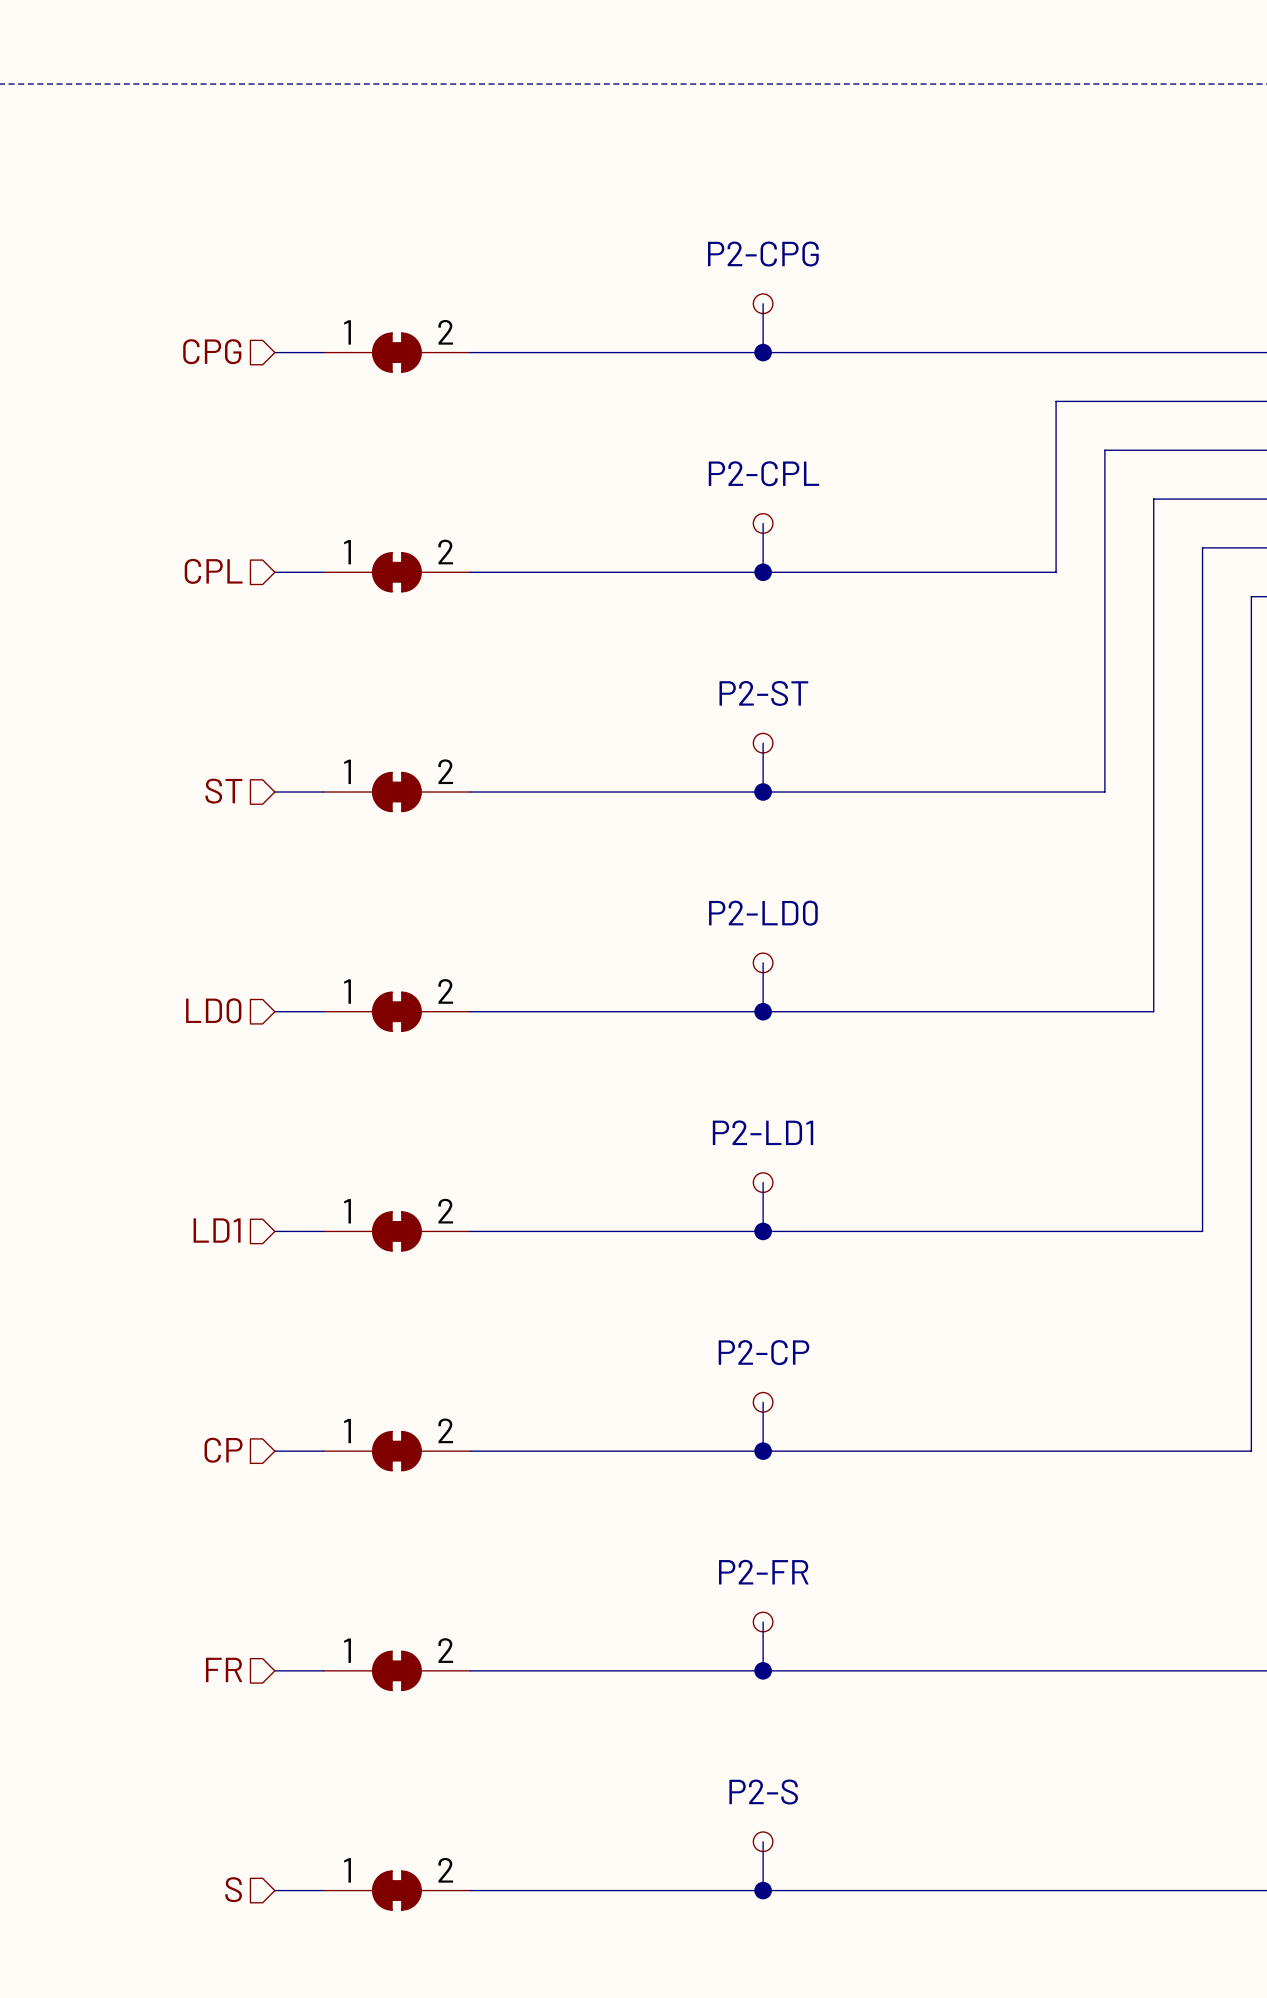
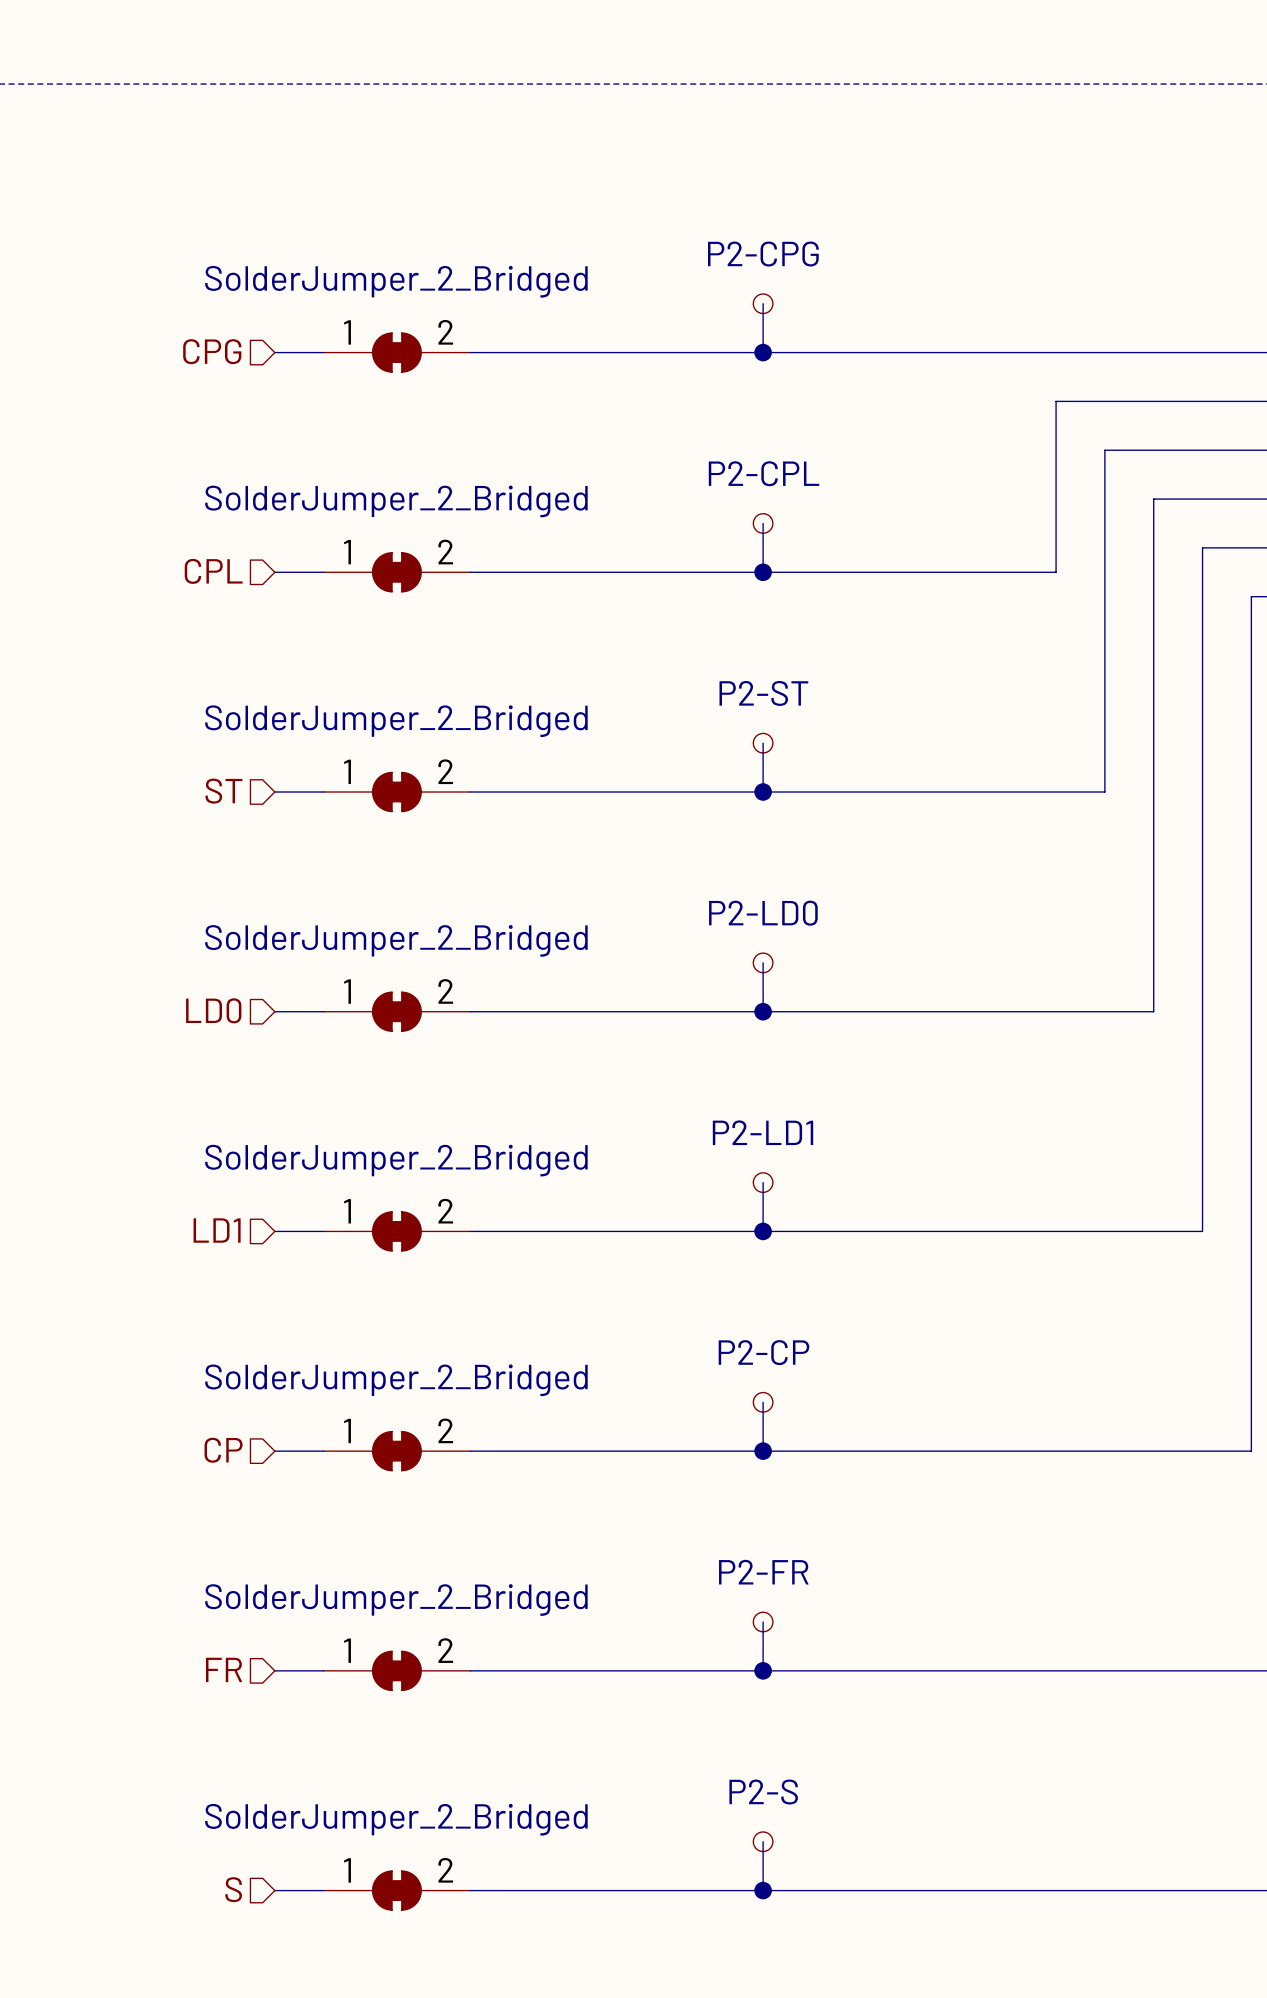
part value: none -> SolderJumper_2_Bridged (396, 281)
part value: none -> SolderJumper_2_Bridged (396, 501)
part value: none -> SolderJumper_2_Bridged (396, 721)
part value: none -> SolderJumper_2_Bridged (396, 940)
part value: none -> SolderJumper_2_Bridged (396, 1160)
part value: none -> SolderJumper_2_Bridged (396, 1380)
part value: none -> SolderJumper_2_Bridged (396, 1600)
part value: none -> SolderJumper_2_Bridged (396, 1819)

